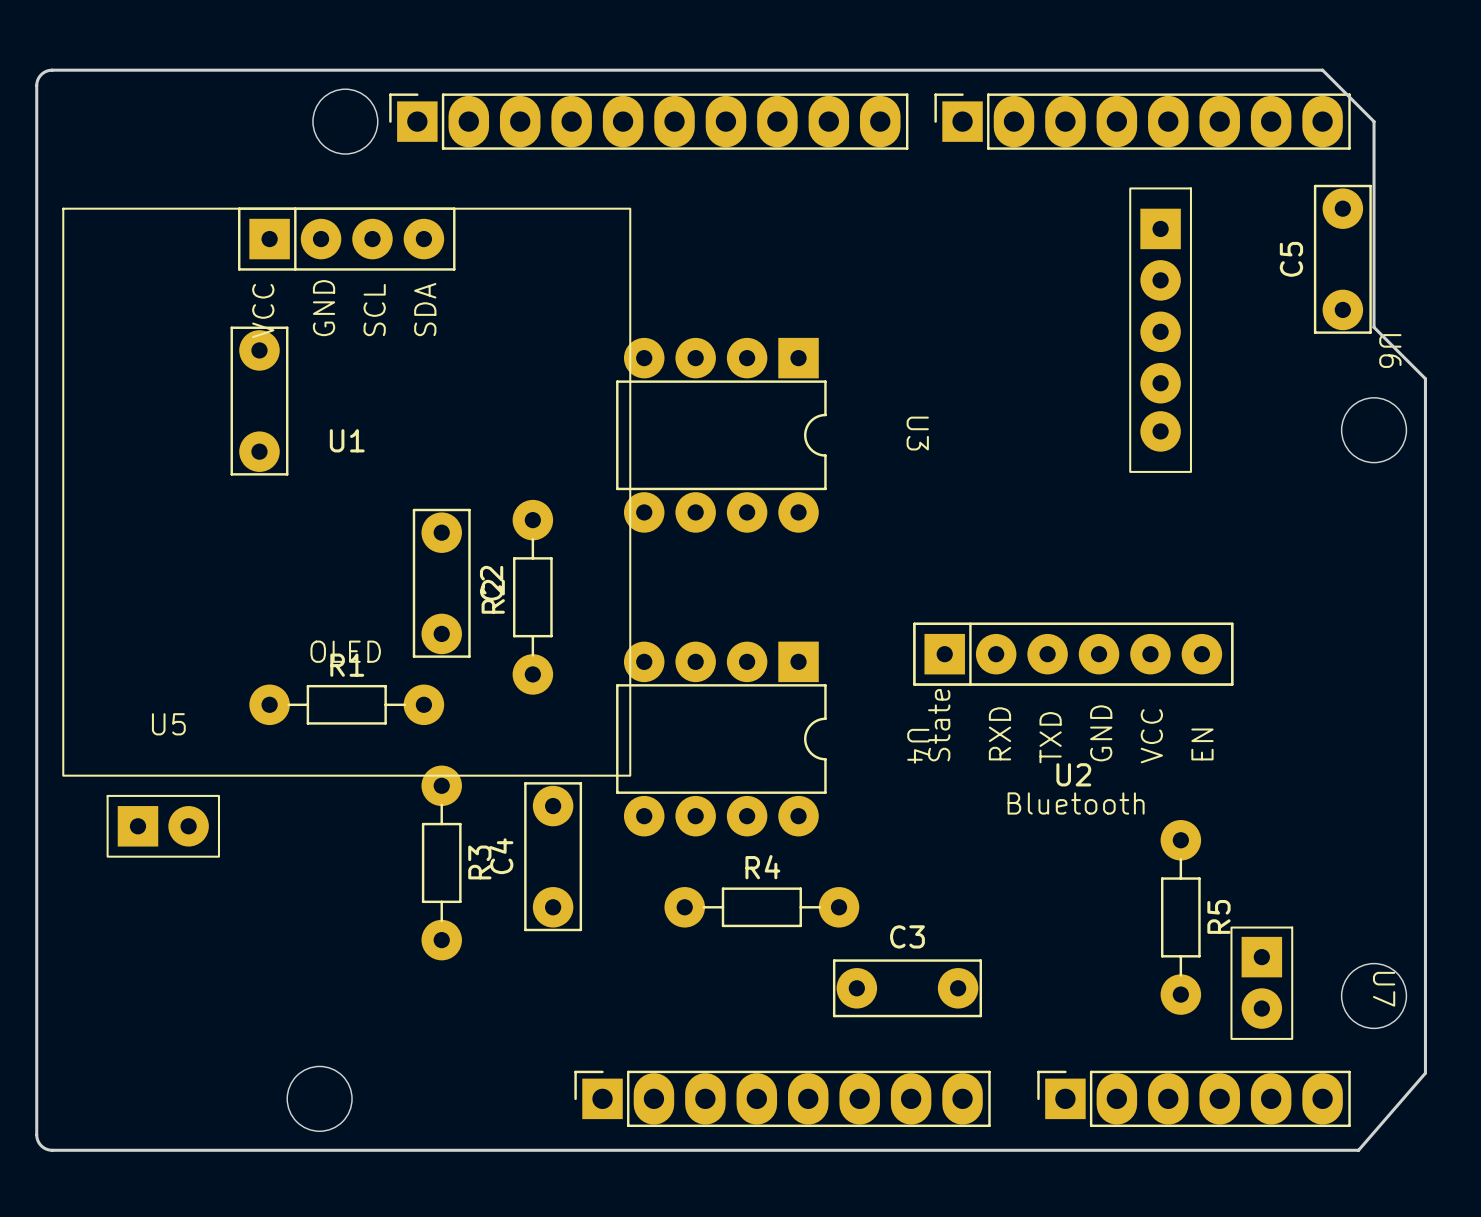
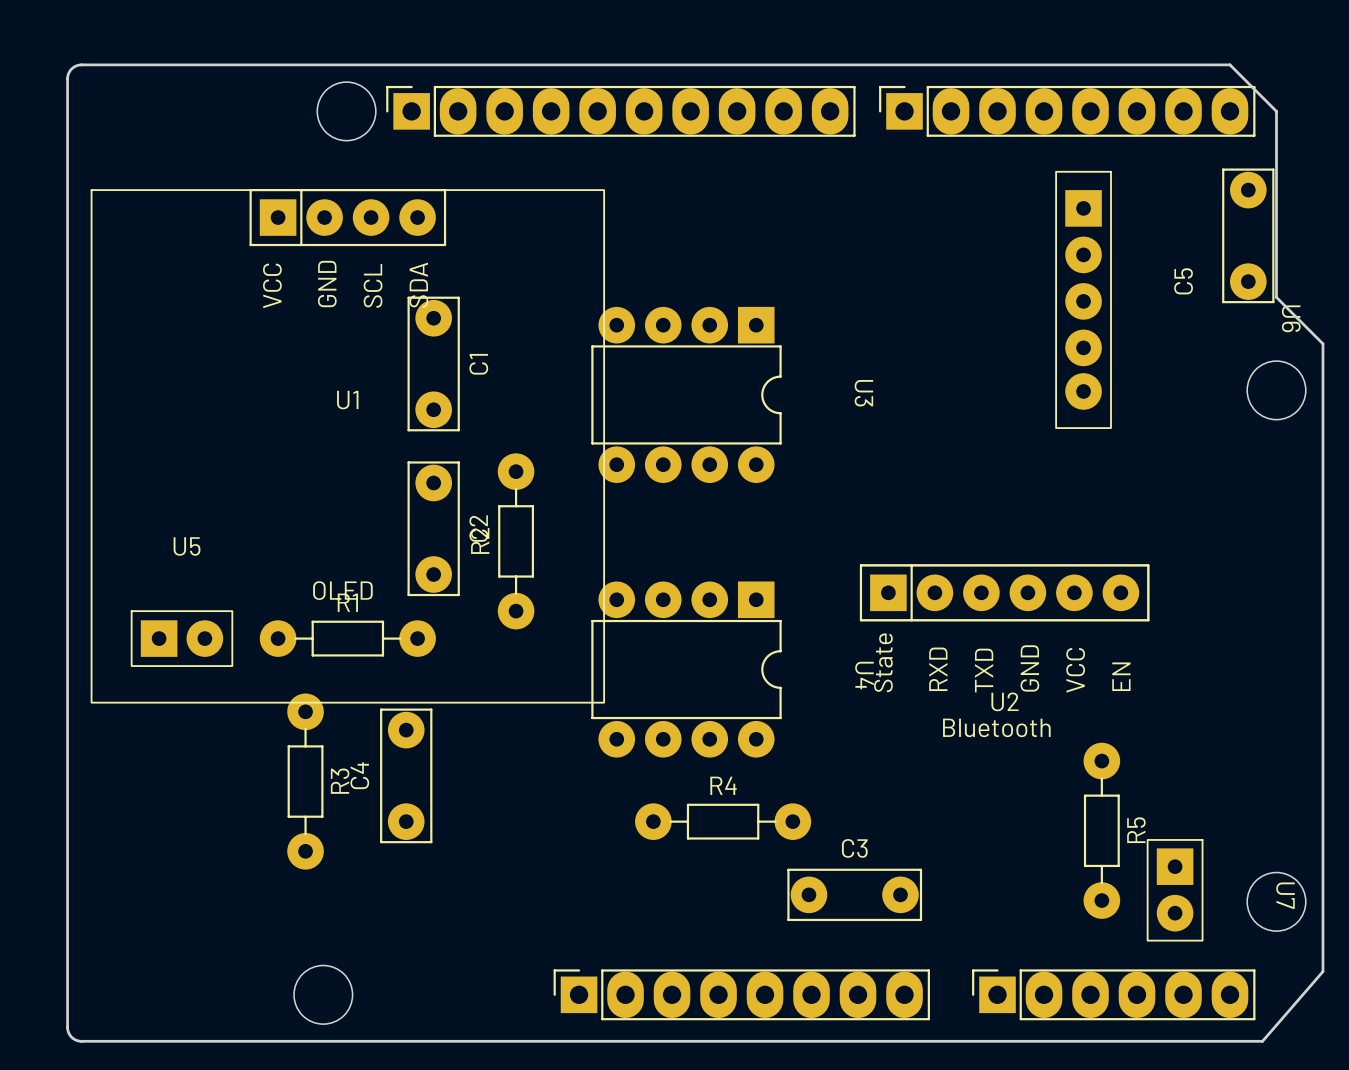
C5 name position: C5 (1291, 259) -> C5 (1183, 281)
part: (259, 401) -> none
C1: none -> (433, 364)
U5 position: (163, 826) -> (181, 638)
C4 position: (553, 856) -> (406, 775)
R3 position: (441, 862) -> (305, 781)

